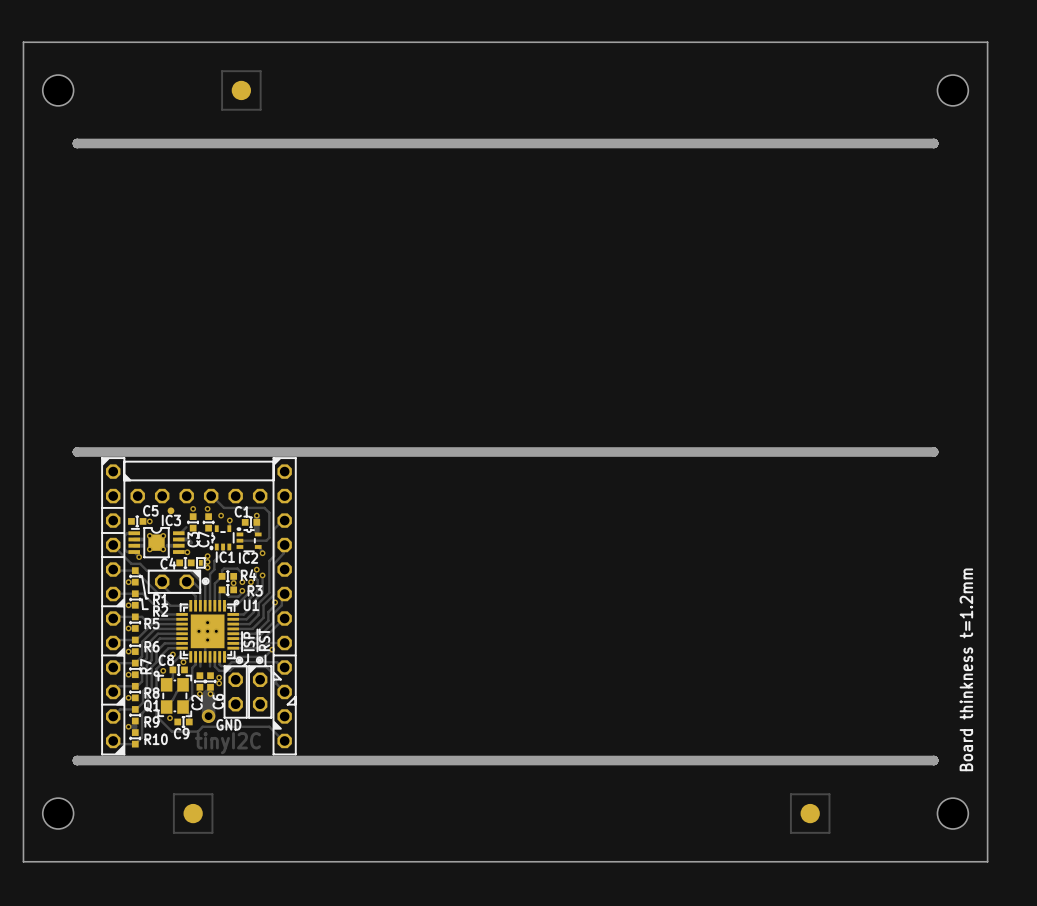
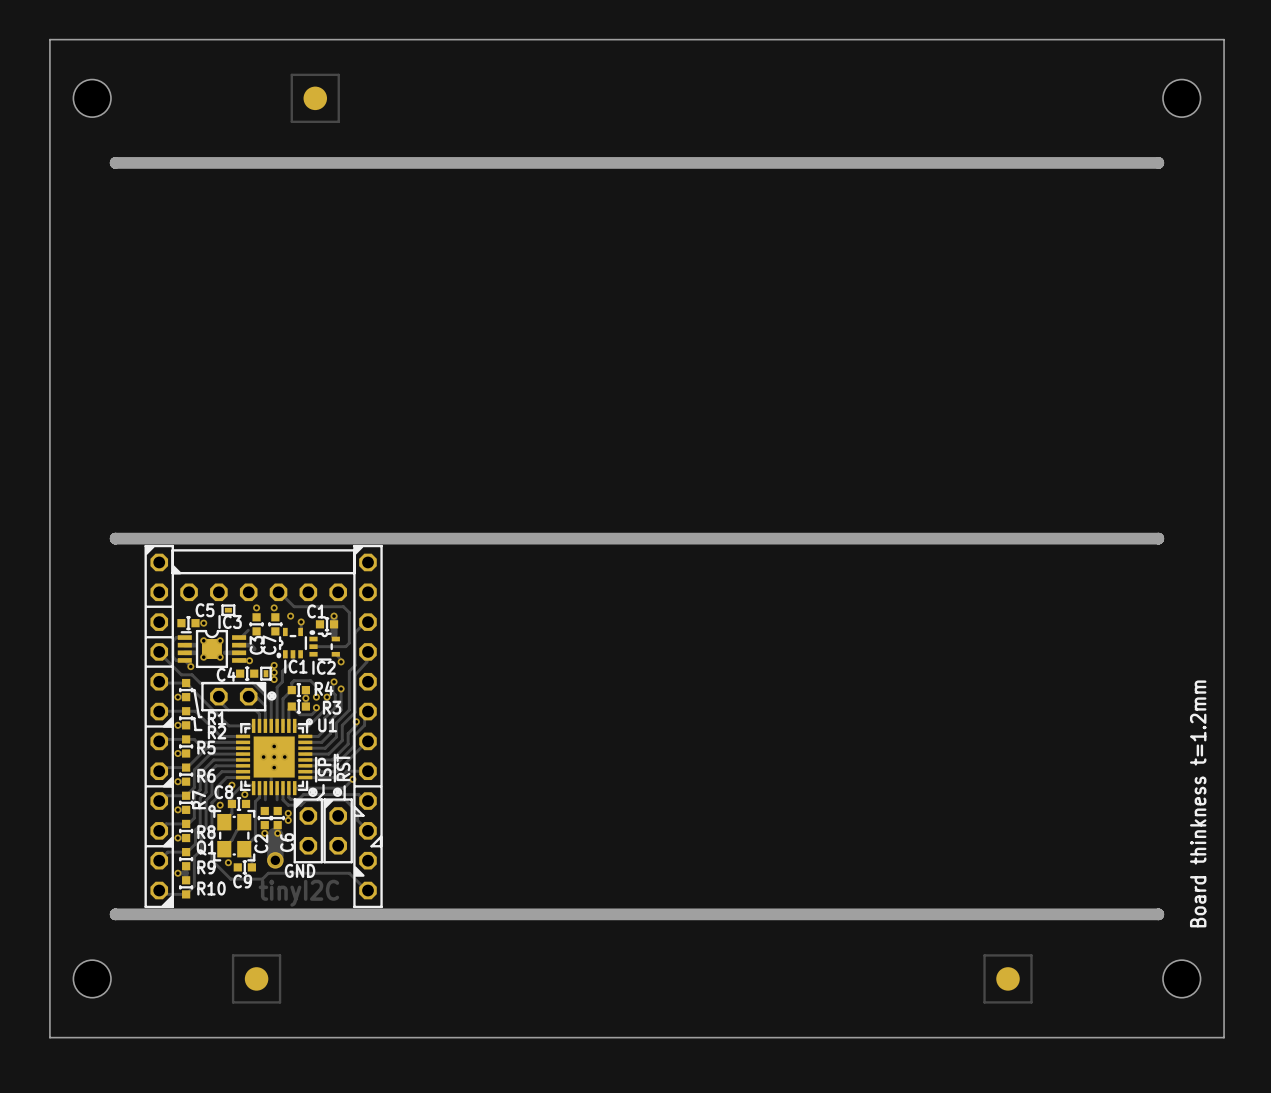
part footprint: [167, 507, 175, 515] -> [221, 604, 236, 617]

